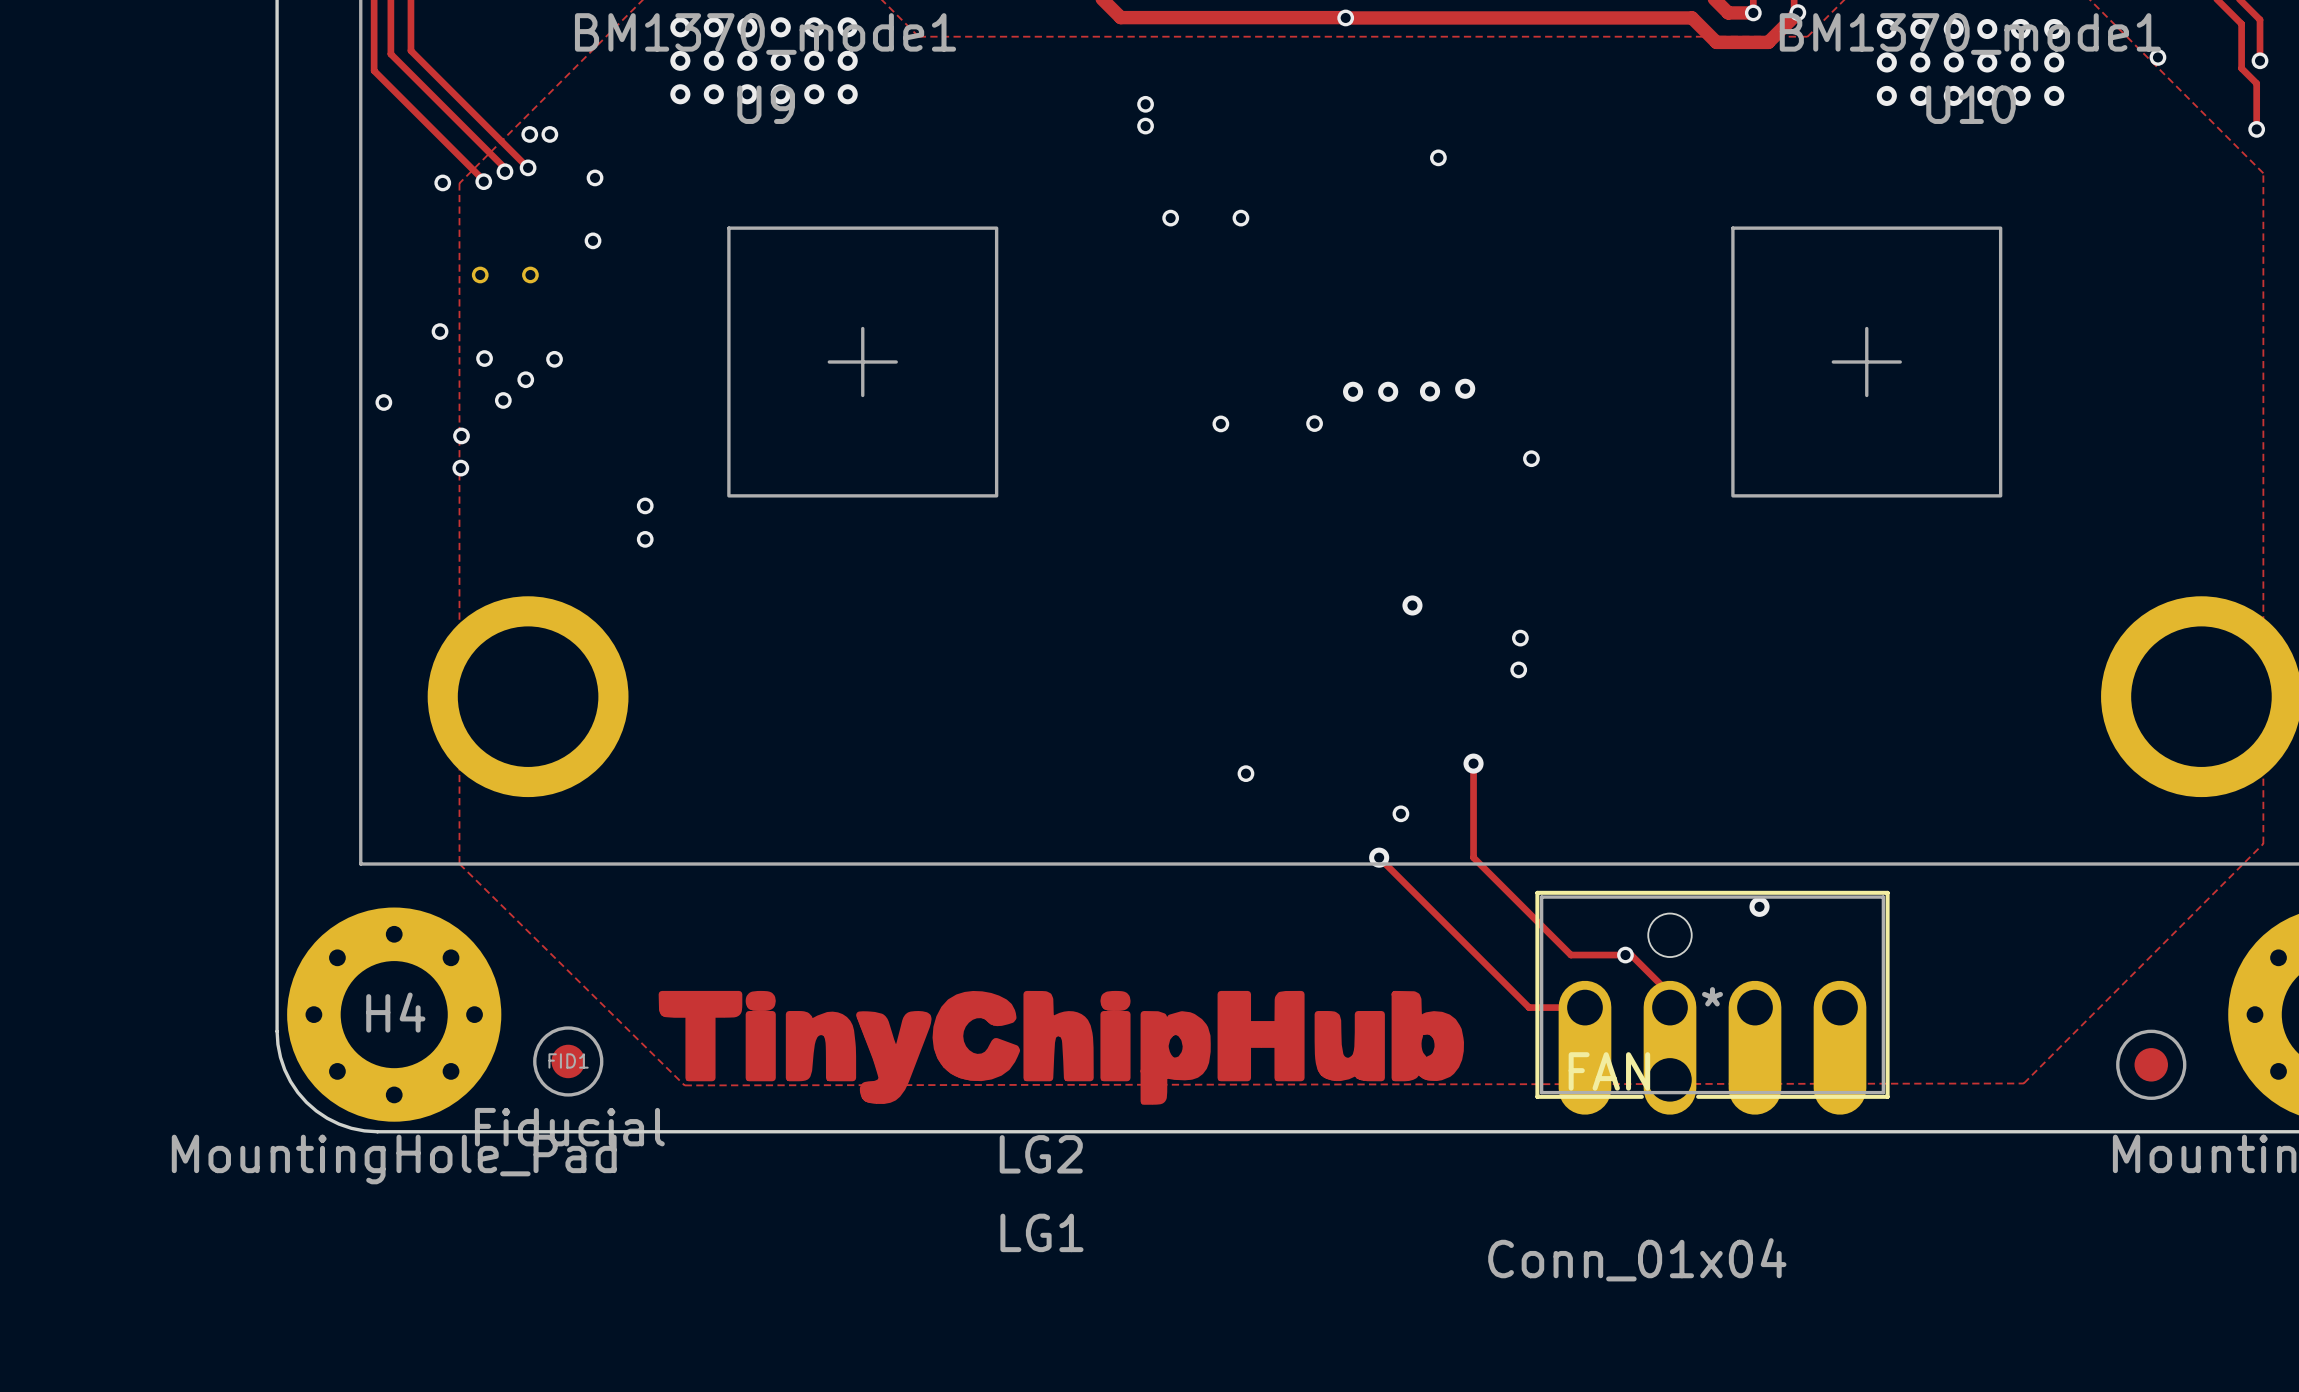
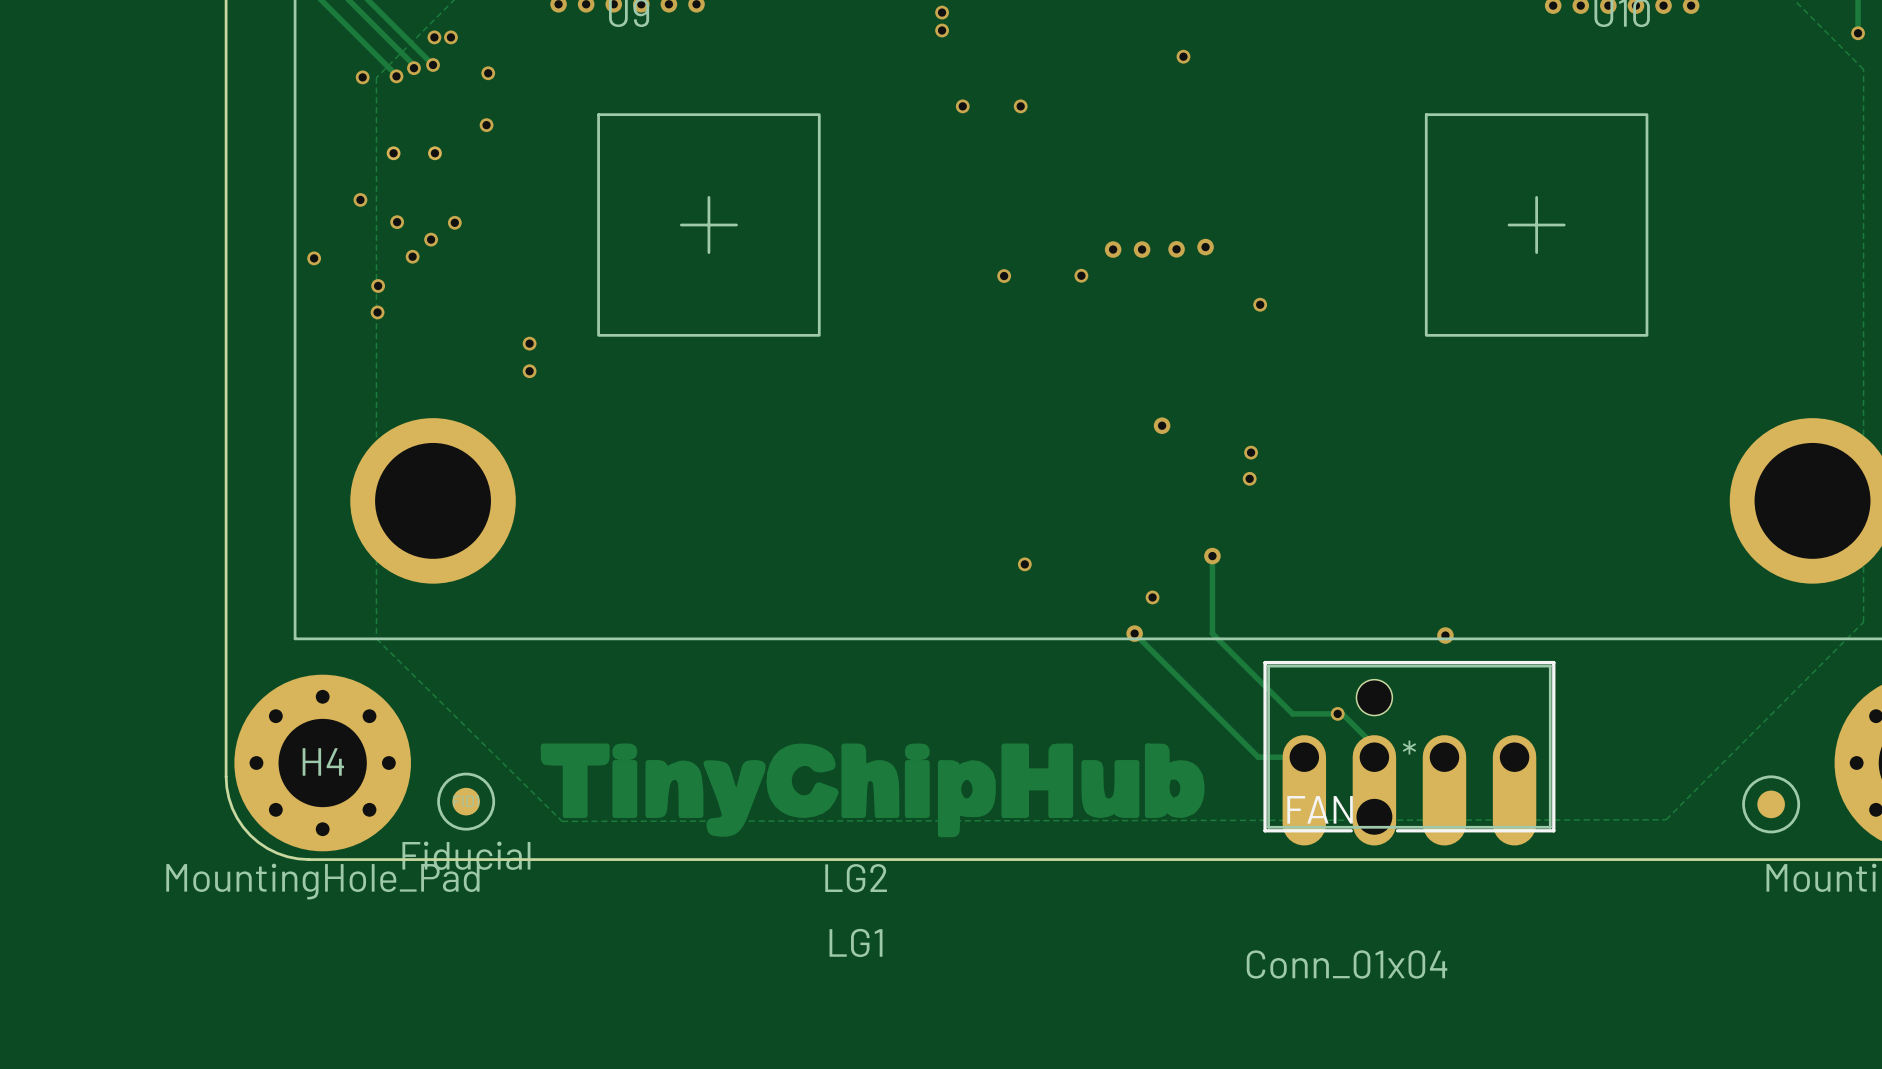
via position: (1759, 906) -> (1445, 635)

